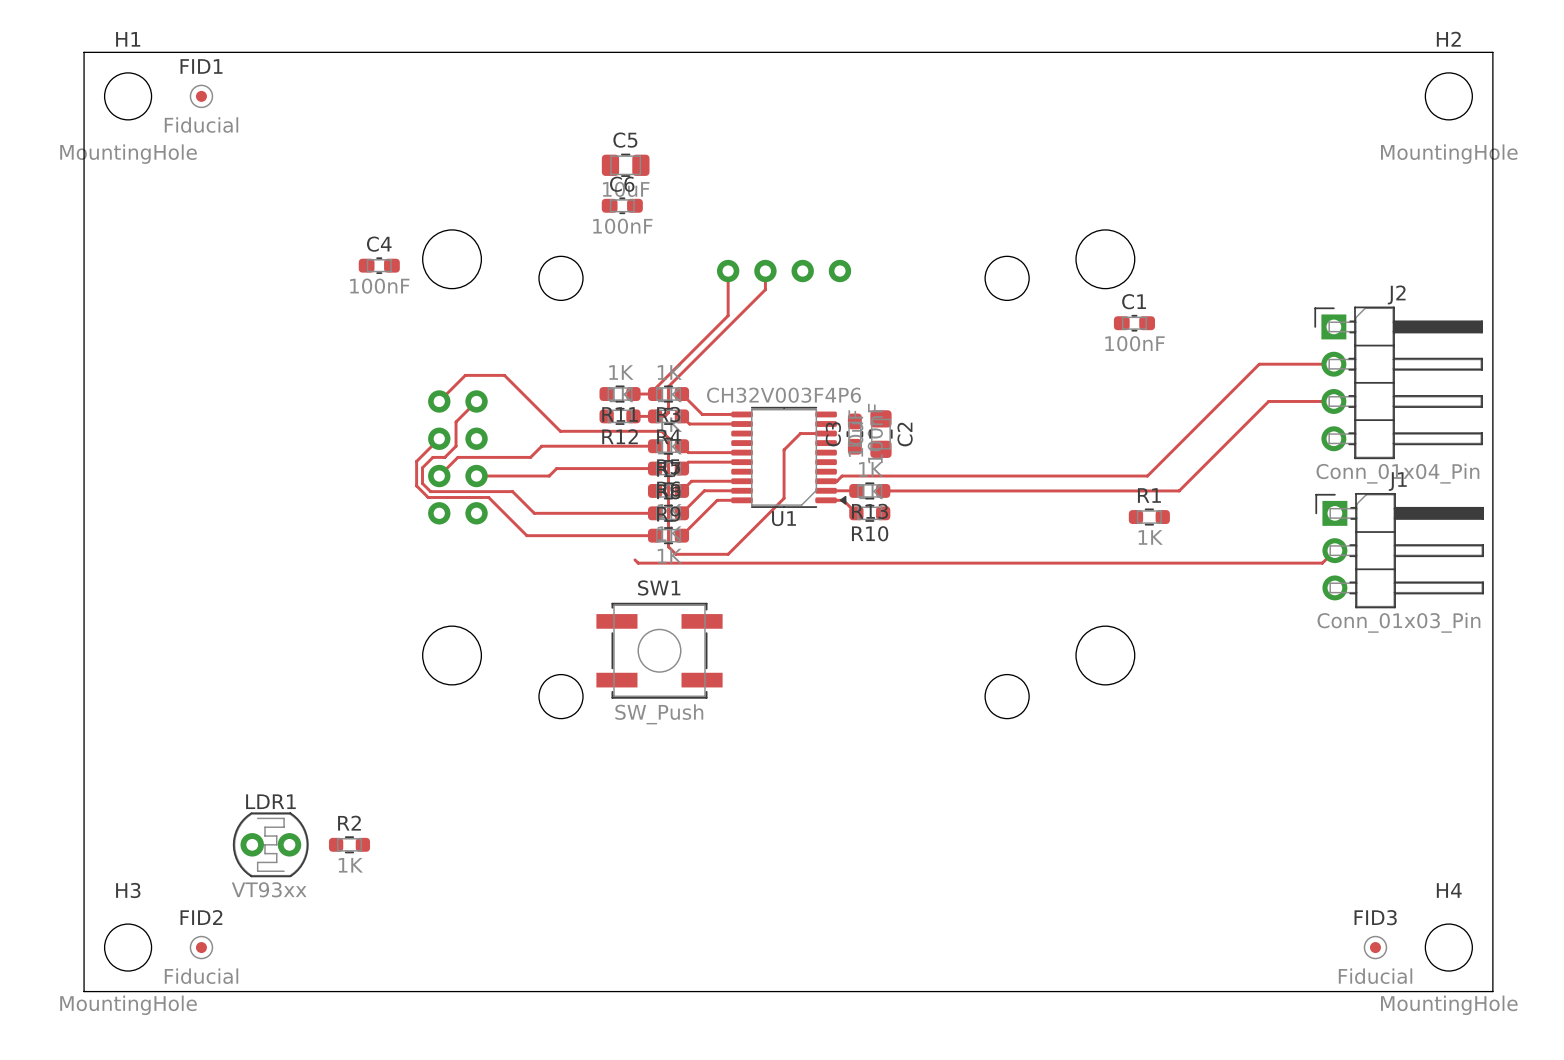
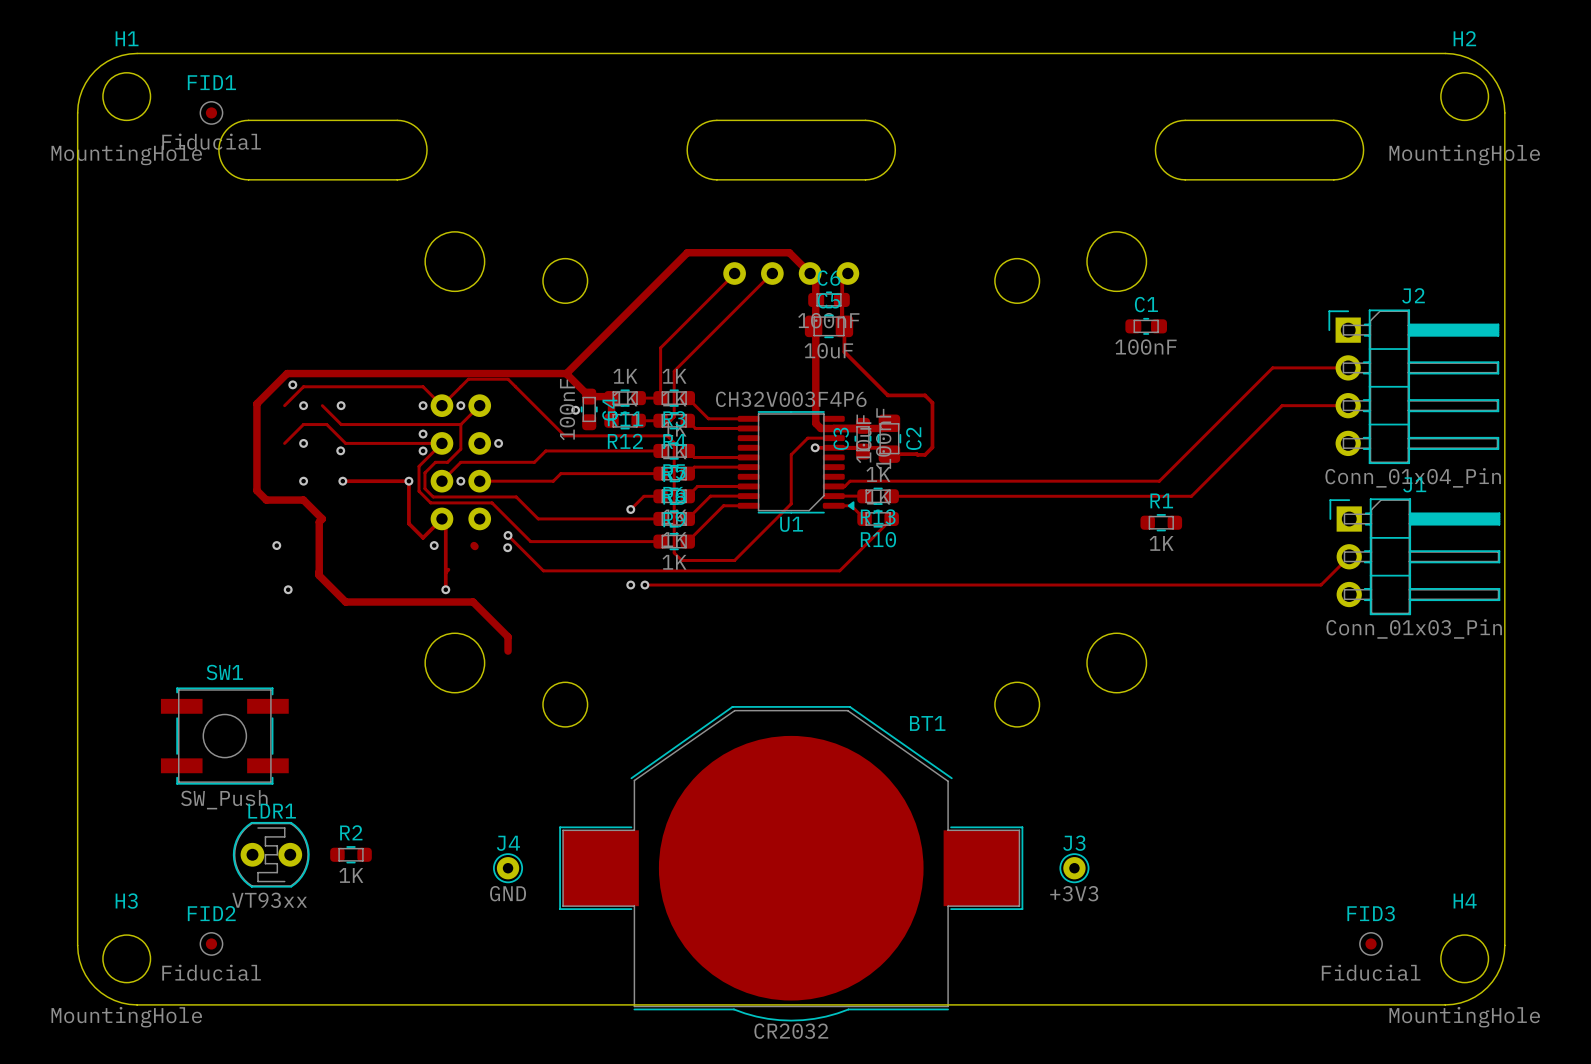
board edge: (84, 52) (1492, 52) (1492, 991) (84, 991) (84, 52) -> (137, 53) (114, 58) (95, 70) (82, 90) (77, 112) (77, 945) (79, 960) (85, 975) (100, 992) (121, 1002) (137, 1004) (1445, 1004) (1460, 1002) (1475, 996) (1492, 981) (1502, 960) (1504, 945) (1504, 112) (1502, 97) (1496, 83) (1481, 65) (1460, 55) (1445, 53) (137, 53)
FID1 position: (201, 96) -> (211, 112)
board edge: none -> (248, 120) (404, 121) (414, 125) (421, 133) (426, 146) (426, 157) (417, 172) (400, 179) (241, 178) (231, 174) (224, 167) (219, 157) (219, 146) (222, 136) (228, 127) (238, 122) (248, 120)
board edge: none -> (716, 120) (873, 121) (883, 126) (891, 135) (895, 146) (894, 157) (891, 164) (883, 173) (869, 179) (709, 178) (698, 173) (691, 164) (687, 153) (687, 146) (691, 135) (698, 126) (709, 121) (716, 120)
board edge: none -> (1185, 120) (1341, 121) (1351, 126) (1359, 135) (1363, 146) (1362, 157) (1354, 171) (1345, 177) (1337, 179) (1177, 178) (1170, 175) (1161, 168) (1156, 157) (1155, 146) (1157, 138) (1164, 129) (1173, 122) (1185, 120)
C5 position: (625, 165) -> (829, 326)
C6 position: (622, 205) -> (829, 299)
C4 rotation: 0° (379, 265) -> 90° clockwise (589, 409)
C4 position: (379, 265) -> (589, 409)
track: (728, 271) (728, 315) (655, 388) -> (734, 273) (660, 347) (660, 392)
track: (765, 271) (765, 289) (668, 386) -> (772, 273) (674, 371) (674, 390)
track: none -> (847, 273) (842, 279) (844, 351) (887, 395) (925, 395) (932, 402) (932, 447) (925, 454) (887, 454) (881, 447) (815, 447)
track: none -> (566, 373) (287, 373) (256, 403) (256, 490) (266, 500) (303, 500) (322, 518) (319, 522) (319, 572)
track: none -> (566, 373) (589, 396) (611, 398) (611, 420)
track: none -> (566, 373) (687, 252) (789, 252) (815, 279) (815, 324) (813, 326) (815, 328) (815, 423) (820, 428) (882, 428) (887, 423)
via: none -> (292, 384)
track: none -> (284, 405) (303, 386) (423, 386) (441, 405)
via: none -> (303, 405)
via: none -> (341, 405)
via: none -> (423, 405)
via: none -> (460, 405)
via: none -> (575, 410)
track: (457, 420) (456, 421) (456, 446) -> (322, 405) (341, 424) (460, 424) (460, 449) (458, 450)
via: none -> (423, 434)
track: none -> (284, 443) (303, 424) (326, 424) (345, 443) (441, 443)
via: none -> (303, 443)
via: none -> (498, 443)
via: none -> (815, 447)
via: none -> (340, 450)
via: none -> (423, 450)
via: none -> (303, 481)
track: none -> (342, 481) (408, 481) (408, 523) (423, 537) (441, 518) (445, 522) (445, 589)
via: none -> (342, 481)
via: none -> (408, 481)
via: none -> (460, 481)
track: none -> (660, 496) (643, 496) (630, 509)
via: none -> (630, 509)
track: none -> (891, 518) (839, 570) (543, 570) (508, 535)
via: none -> (508, 535)
via: none -> (276, 545)
via: none -> (434, 545)
track: none -> (474, 545) (475, 546)
via: none -> (507, 547)
track: (634, 559) (638, 563) (1322, 563) -> (644, 585) (1321, 585) (1336, 569)
track: none -> (448, 569) (445, 572)
track: none -> (319, 572) (319, 575) (345, 602) (473, 602) (508, 636) (508, 651)
via: none -> (630, 585)
via: none -> (644, 585)
via: none -> (288, 589)
via: none -> (445, 589)
SW1 position: (659, 650) -> (224, 736)
BT1: none -> CR2032 (791, 863)
J4: none -> GND (508, 868)
J3: none -> +3V3 (1074, 868)
FID2 position: (201, 947) -> (211, 943)
FID3 position: (1375, 947) -> (1371, 943)

